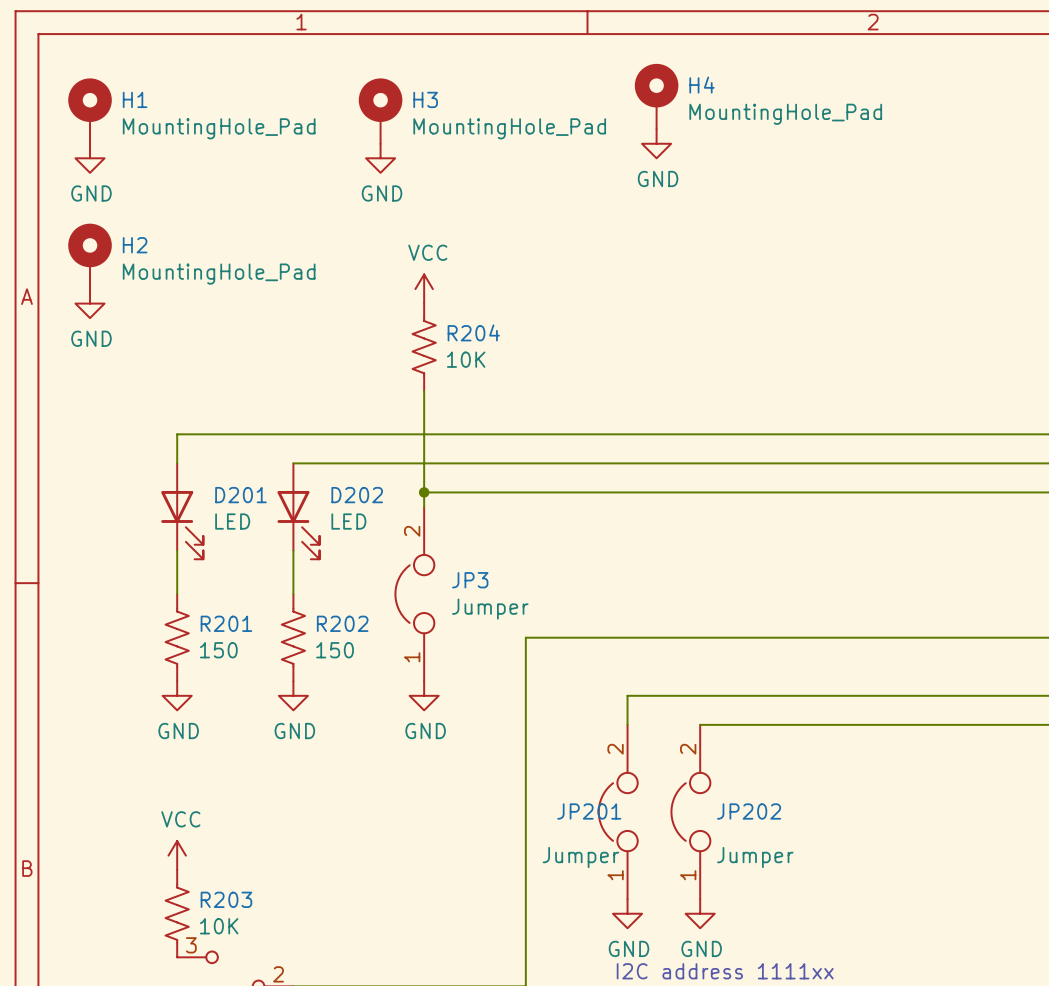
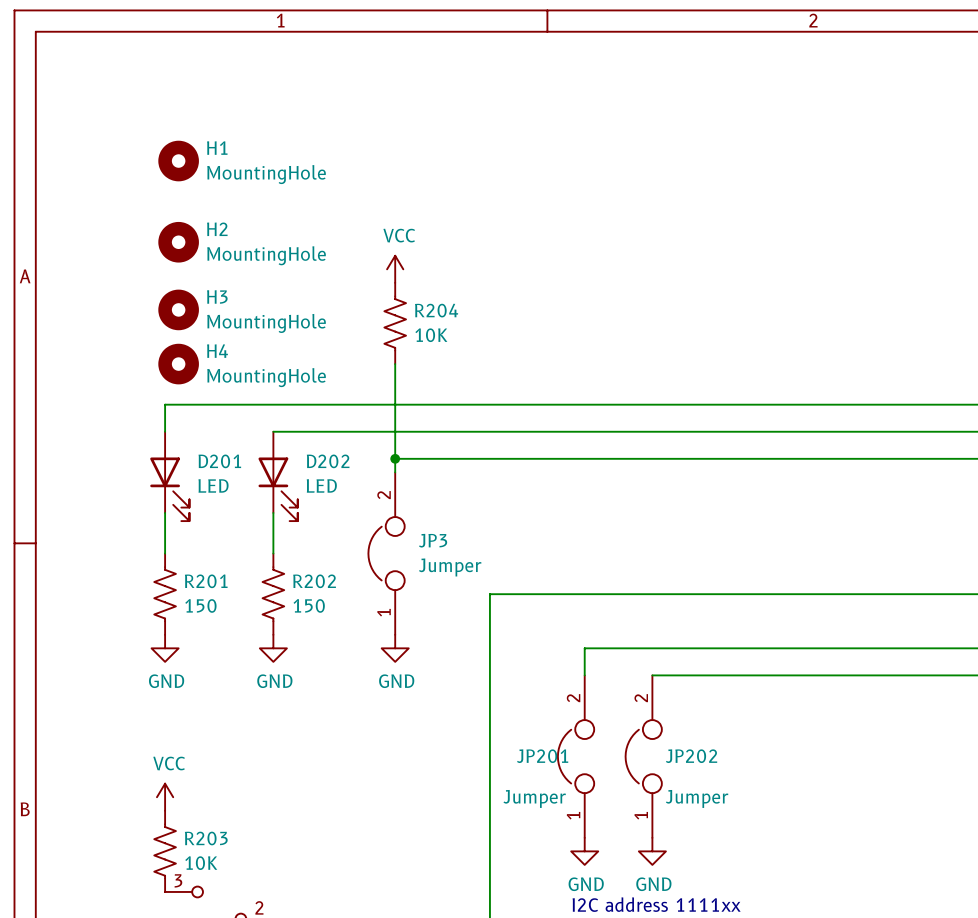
H4 symbol: [634, 63, 679, 130] -> [158, 343, 199, 385]
H1 symbol: [68, 78, 112, 144] -> [158, 140, 199, 182]
H3 symbol: [358, 78, 403, 144] -> [158, 289, 199, 331]
H4 value: MountingHole_Pad (785, 114) -> MountingHole (266, 377)
H1 value: MountingHole_Pad (219, 128) -> MountingHole (266, 174)
H3 value: MountingHole_Pad (509, 128) -> MountingHole (266, 323)
power symbol: GND (656, 143) -> none
power symbol: GND (90, 158) -> none
power symbol: GND (380, 158) -> none
H2 symbol: [68, 223, 112, 290] -> [158, 221, 199, 263]
H2 value: MountingHole_Pad (219, 274) -> MountingHole (266, 255)
power symbol: GND (90, 303) -> none

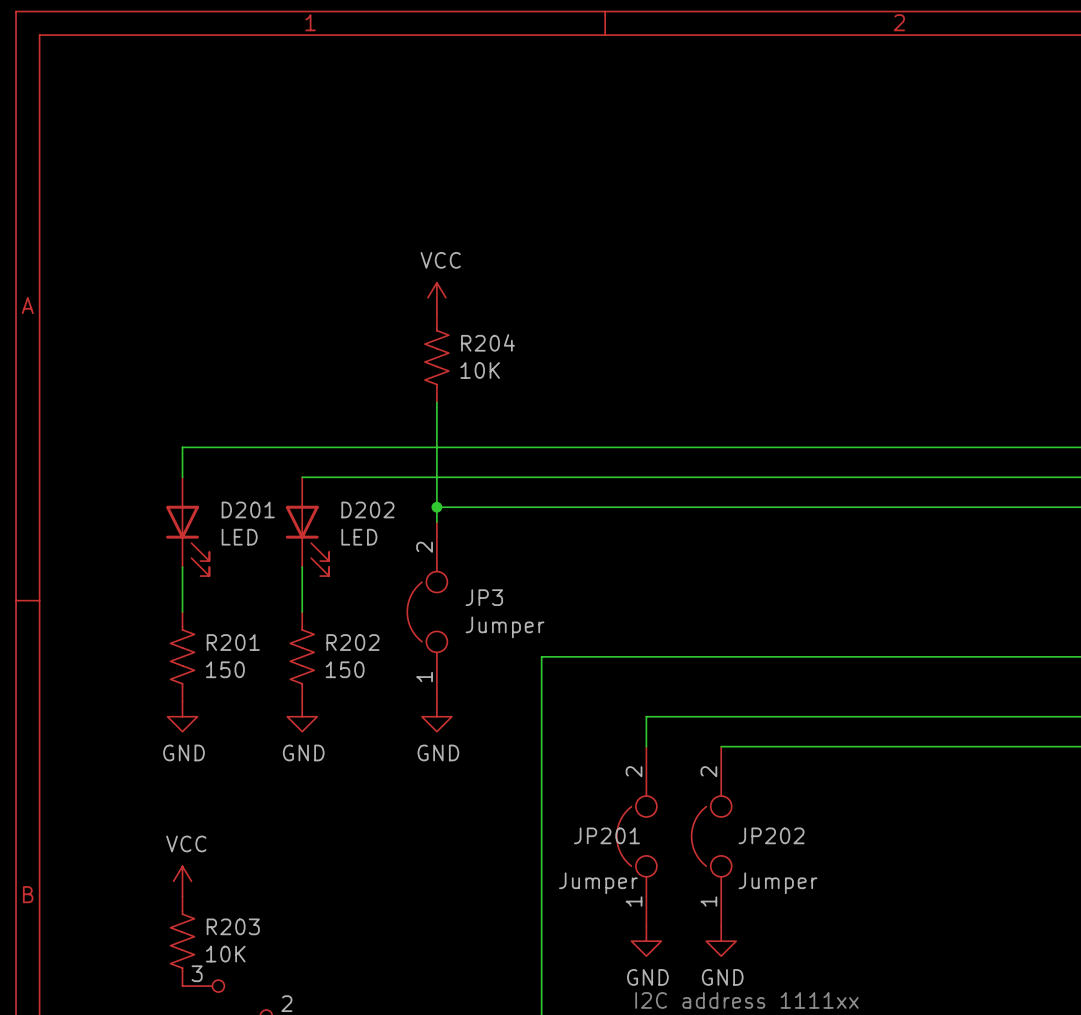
H1: MountingHole (178, 161) -> none
H2: MountingHole (178, 242) -> none
H3: MountingHole (178, 309) -> none
H4: MountingHole (178, 364) -> none

